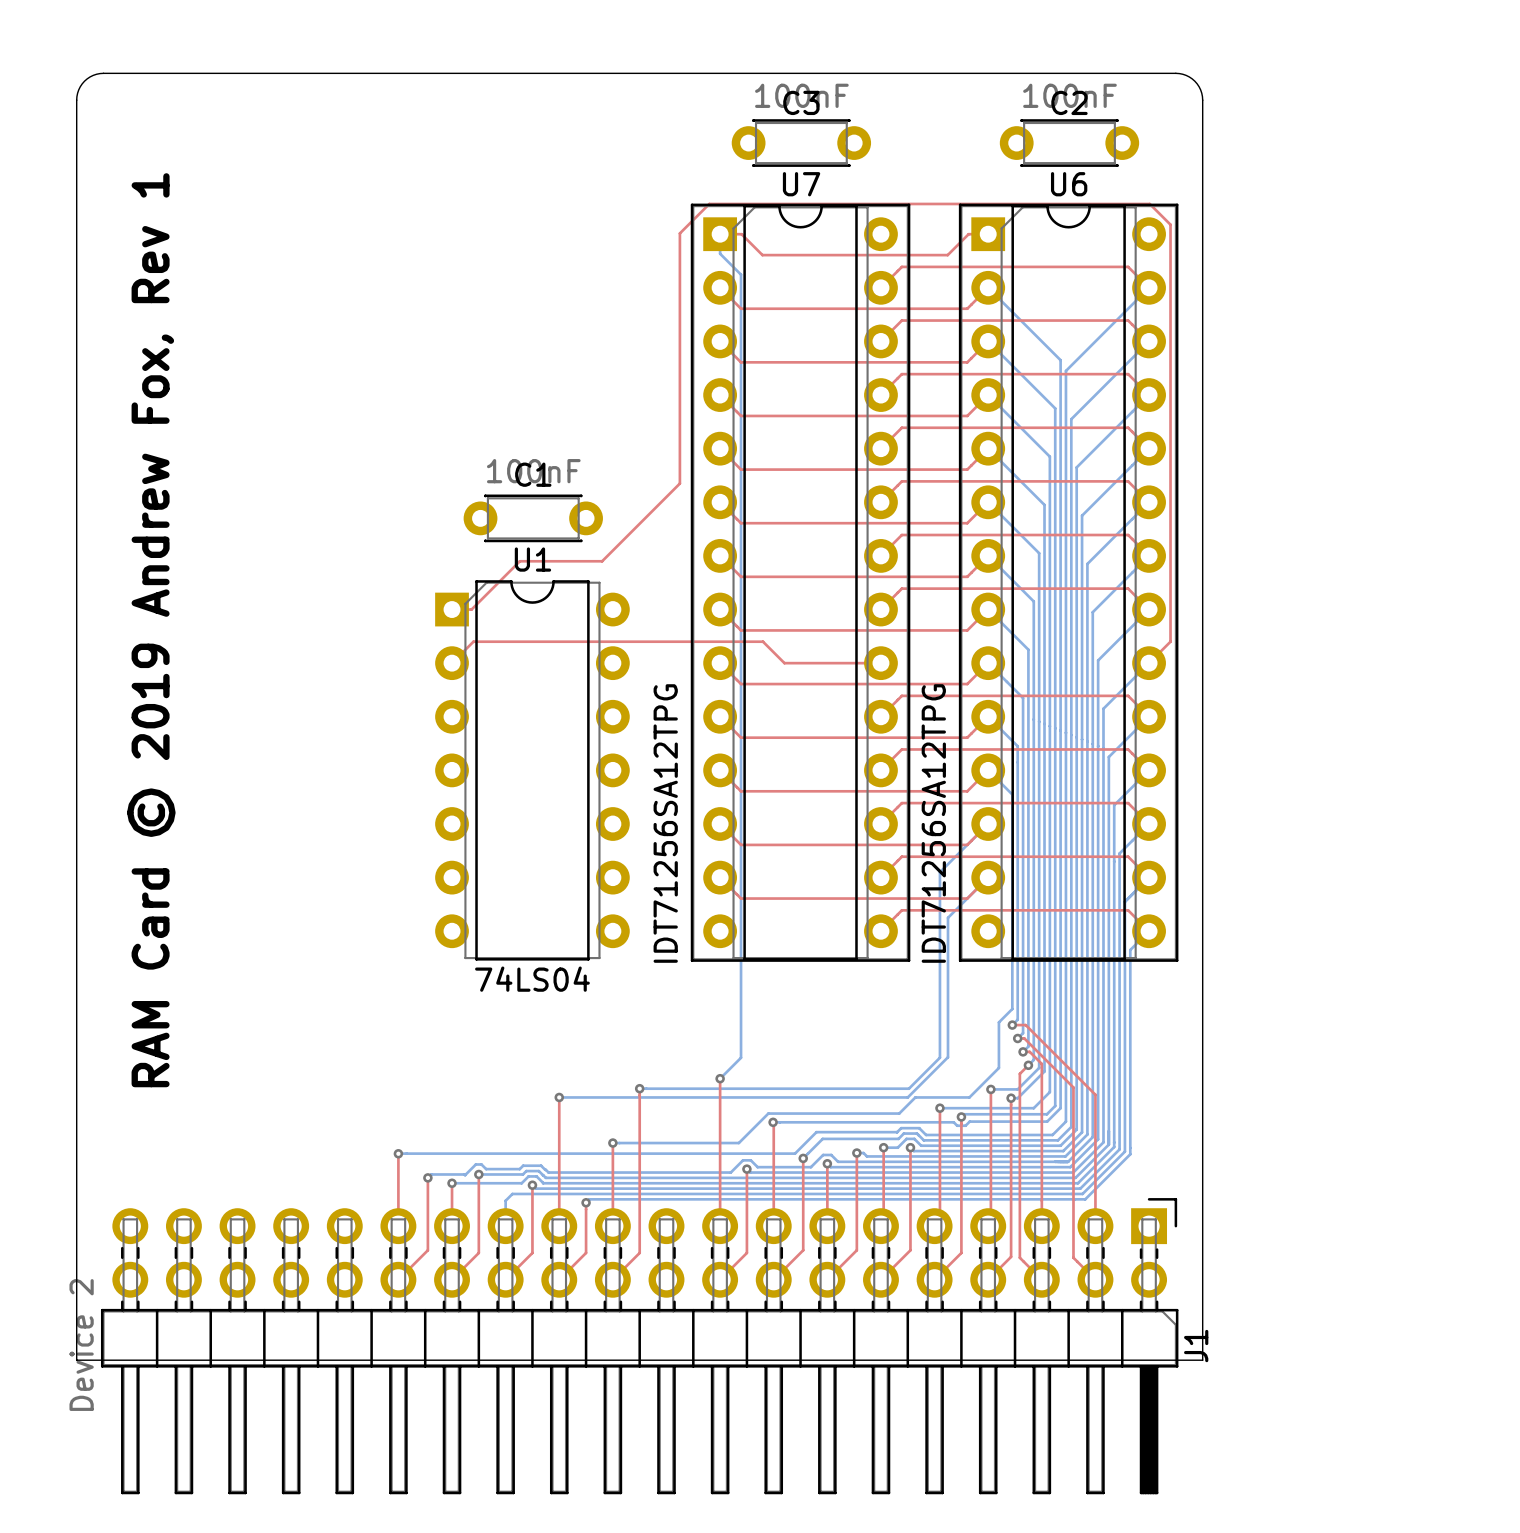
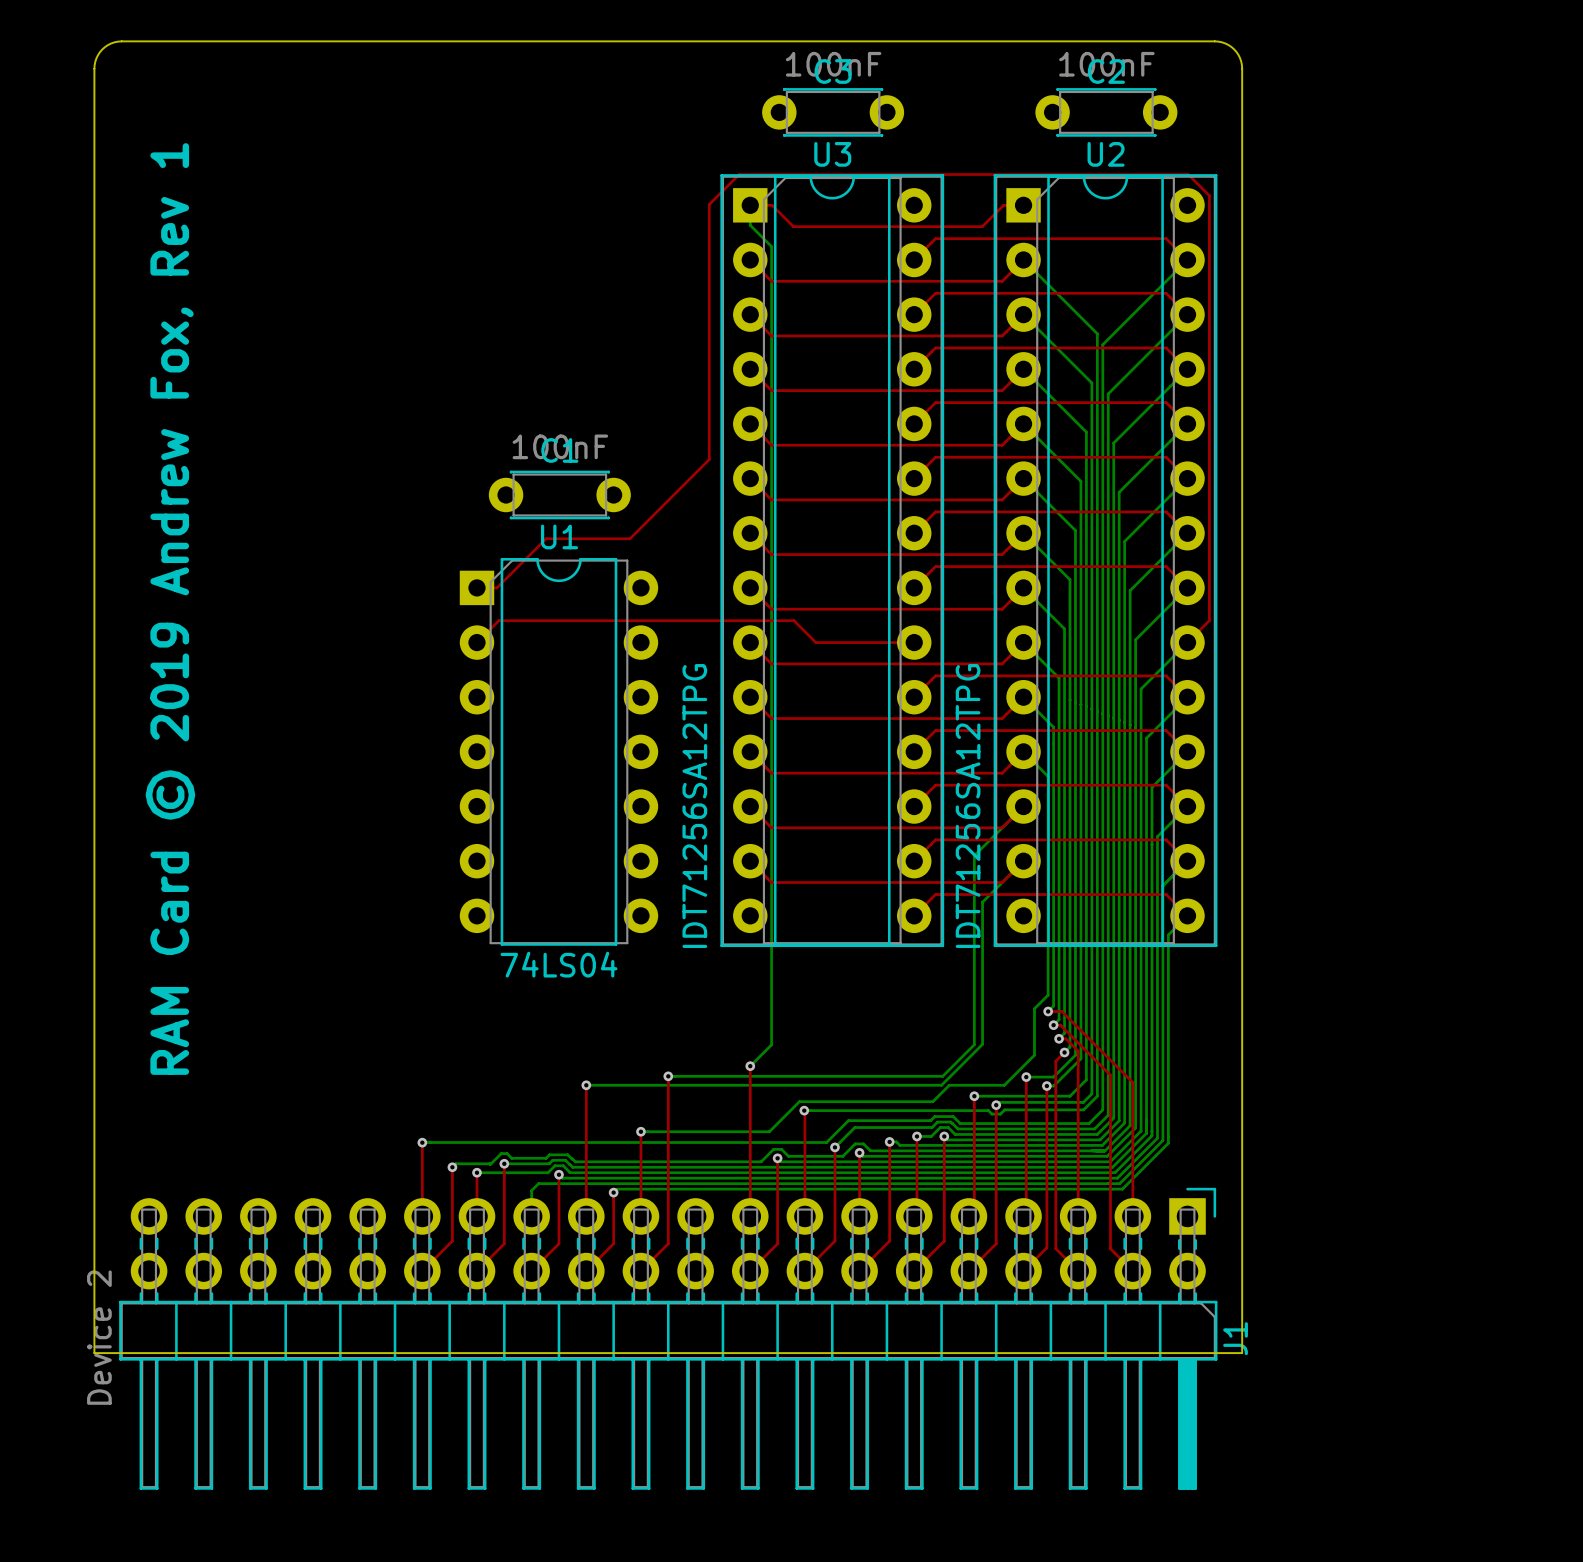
U7 name: U7 (801, 184) -> U3 (832, 154)
U6 name: U6 (1069, 184) -> U2 (1106, 154)

